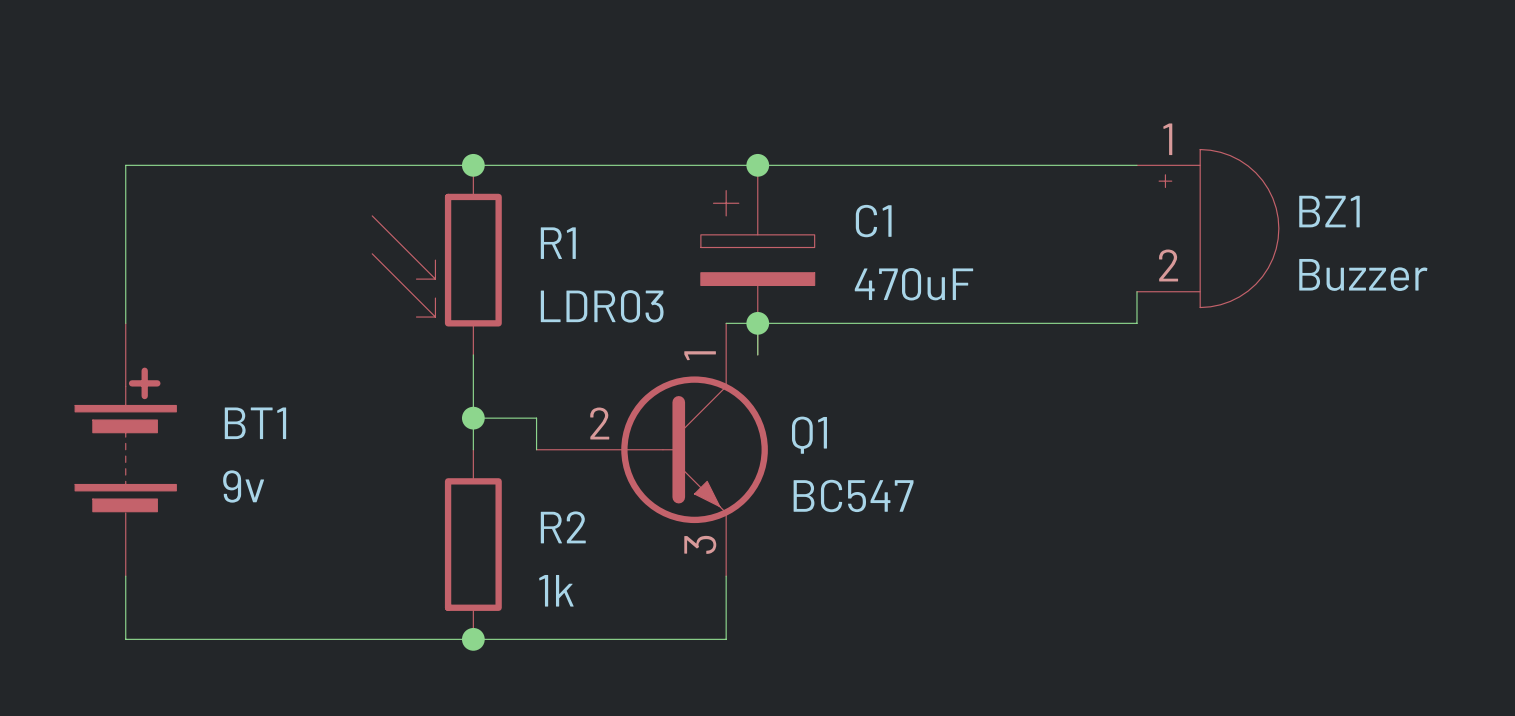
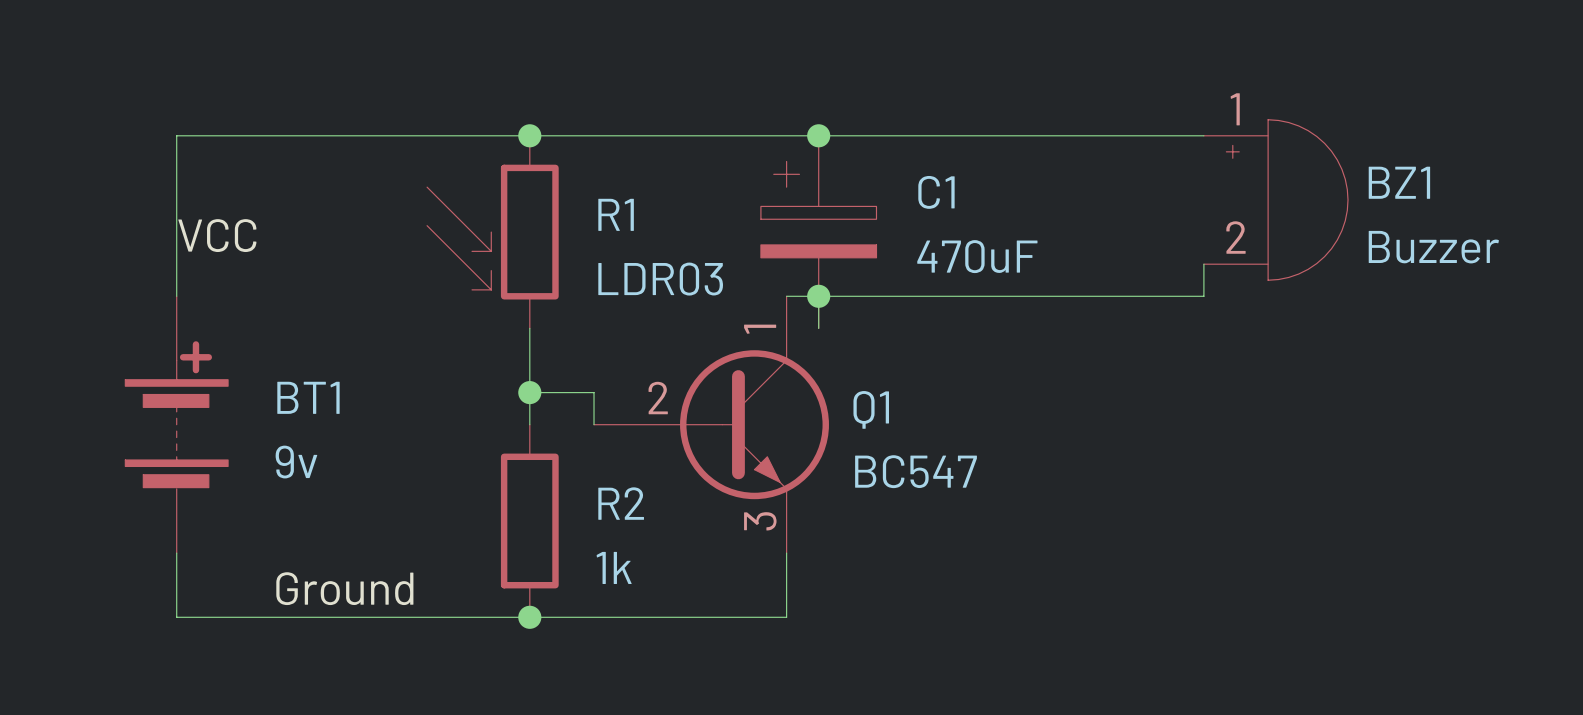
label: none -> VCC (217, 235)
label: none -> Ground (344, 588)

